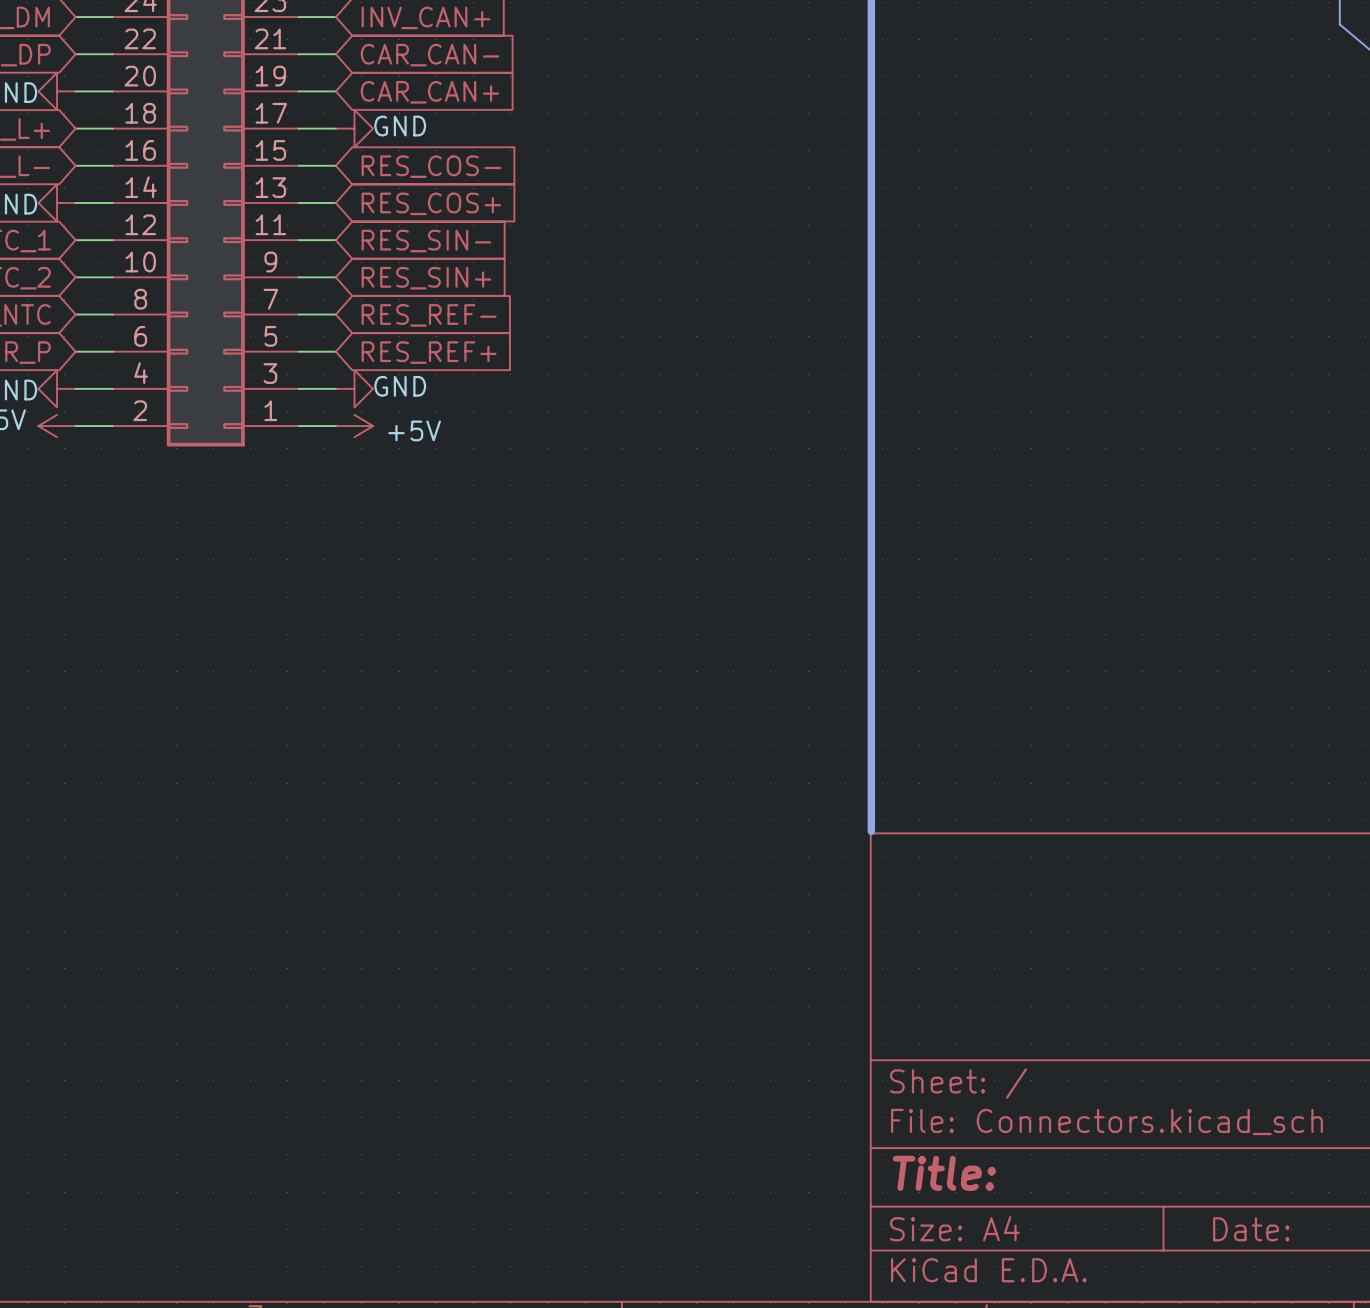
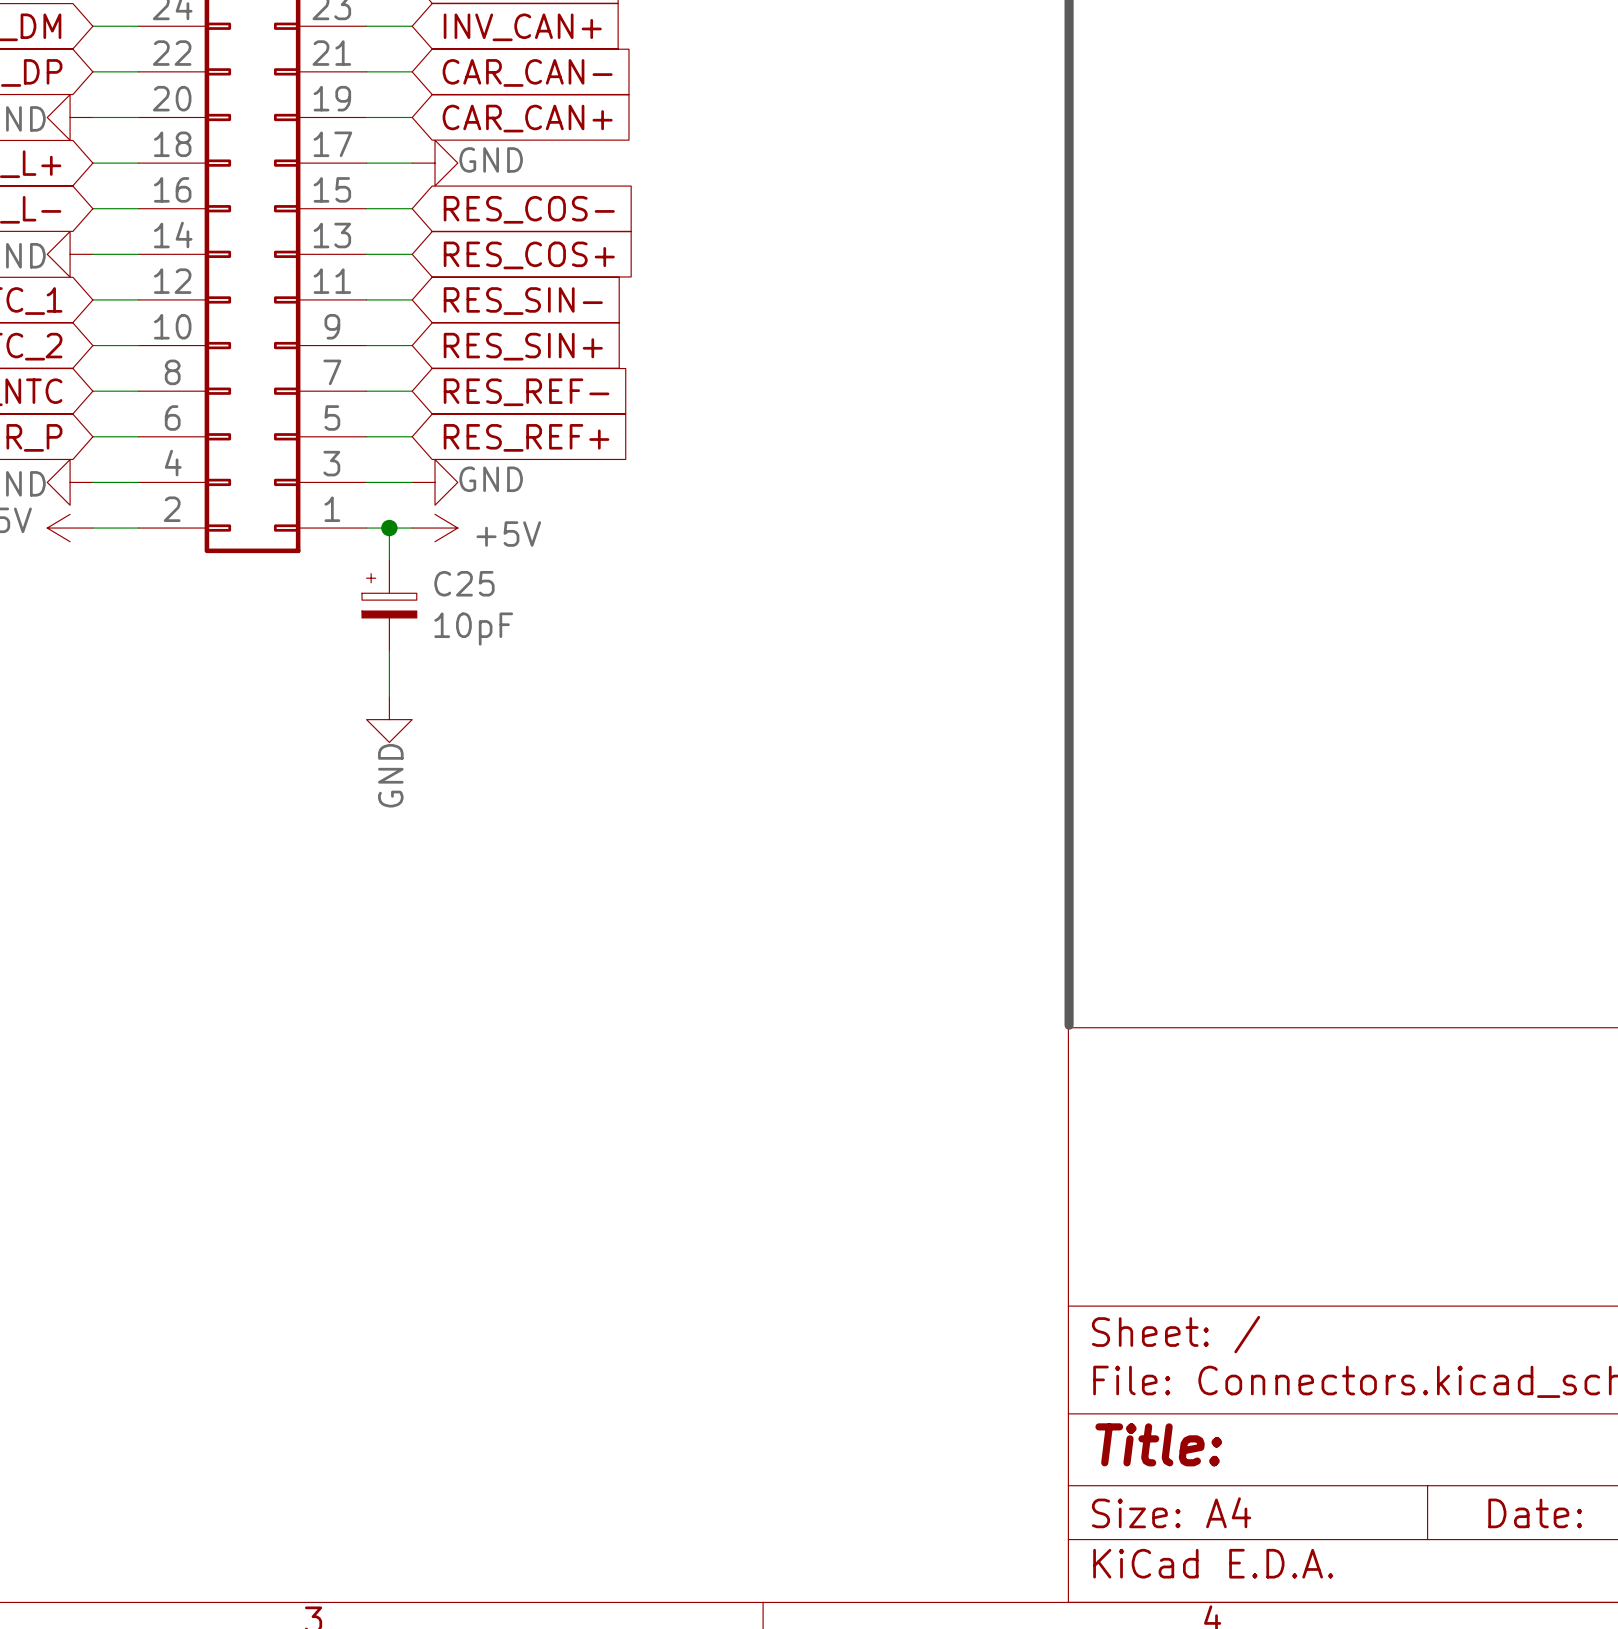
wire: none -> (389, 528) (389, 559)
junction: none -> (389, 528)
C25: none -> 10pF (389, 605)
wire: none -> (389, 651) (389, 696)
power symbol: none -> GND (389, 719)

